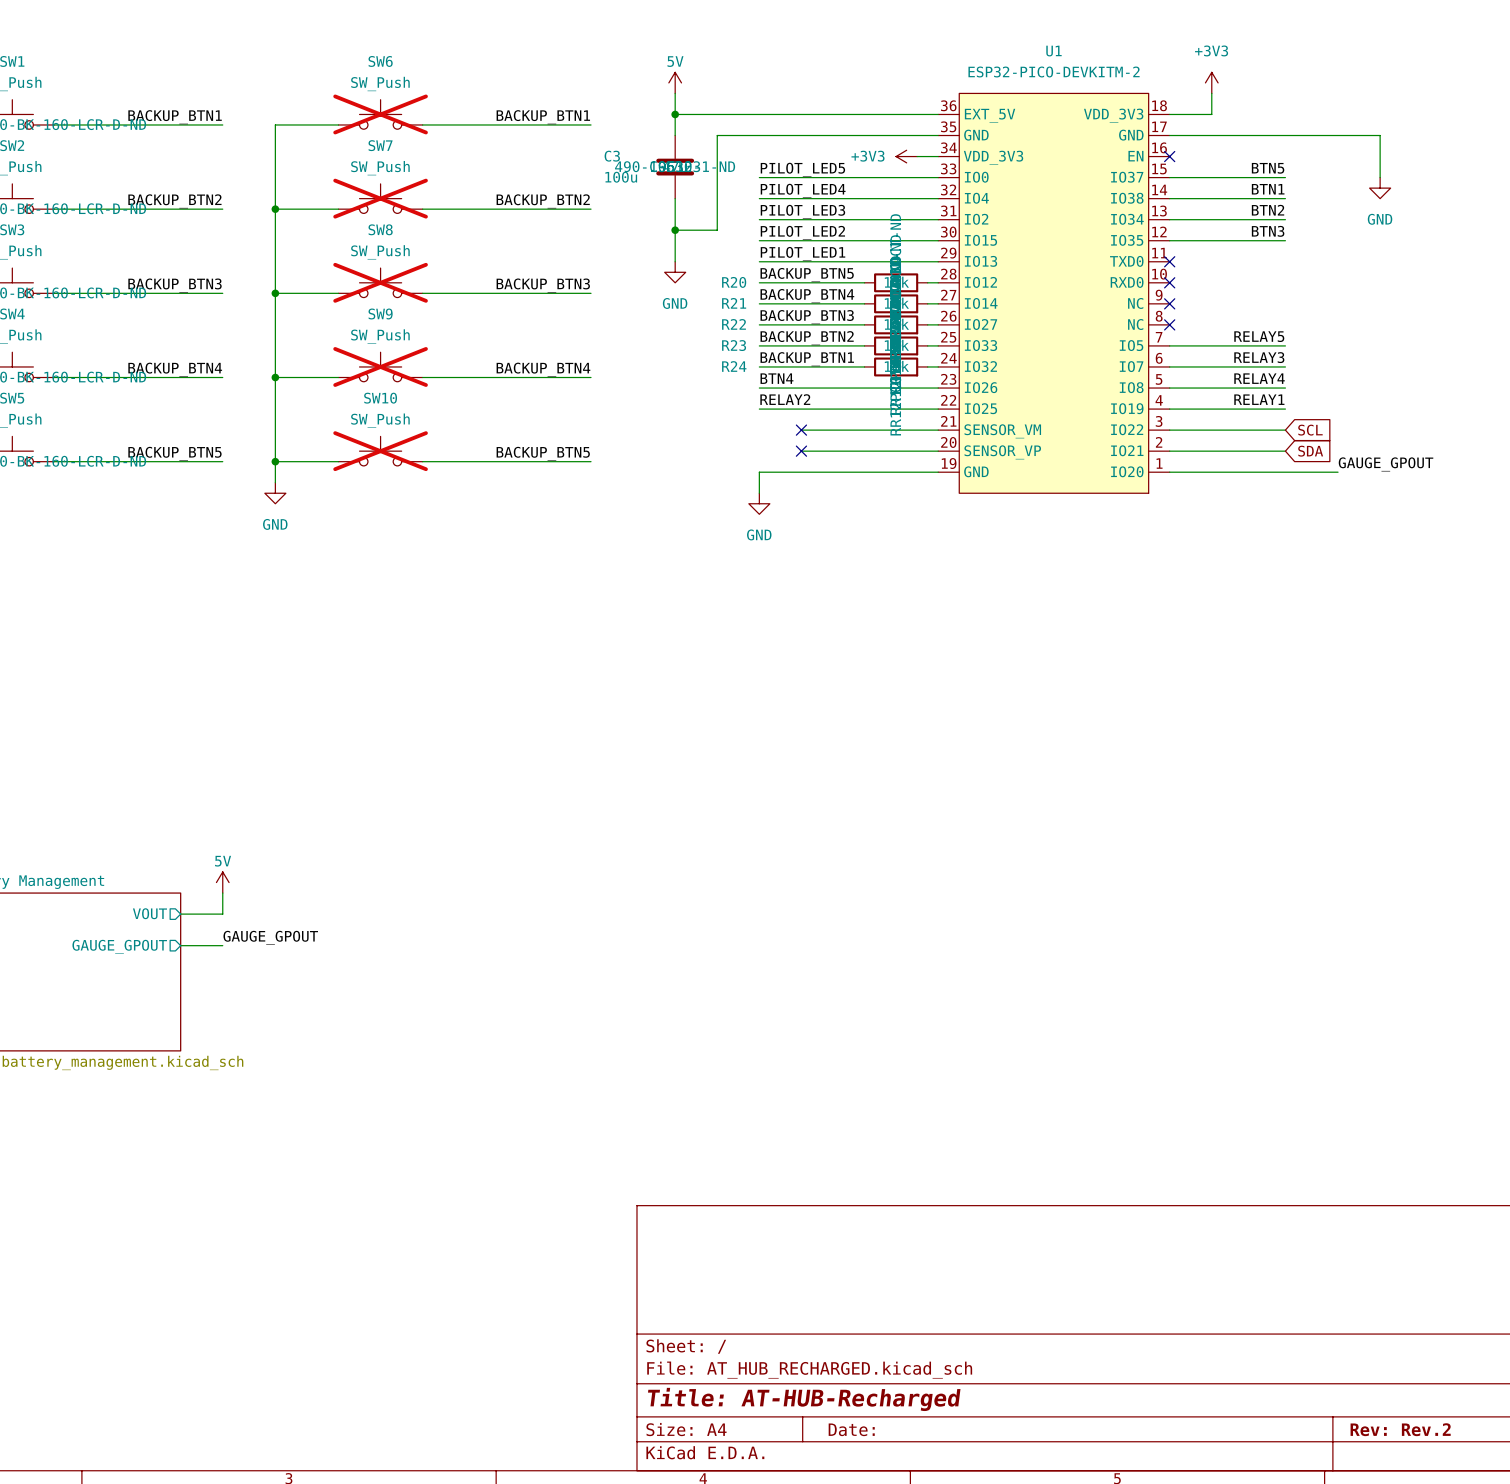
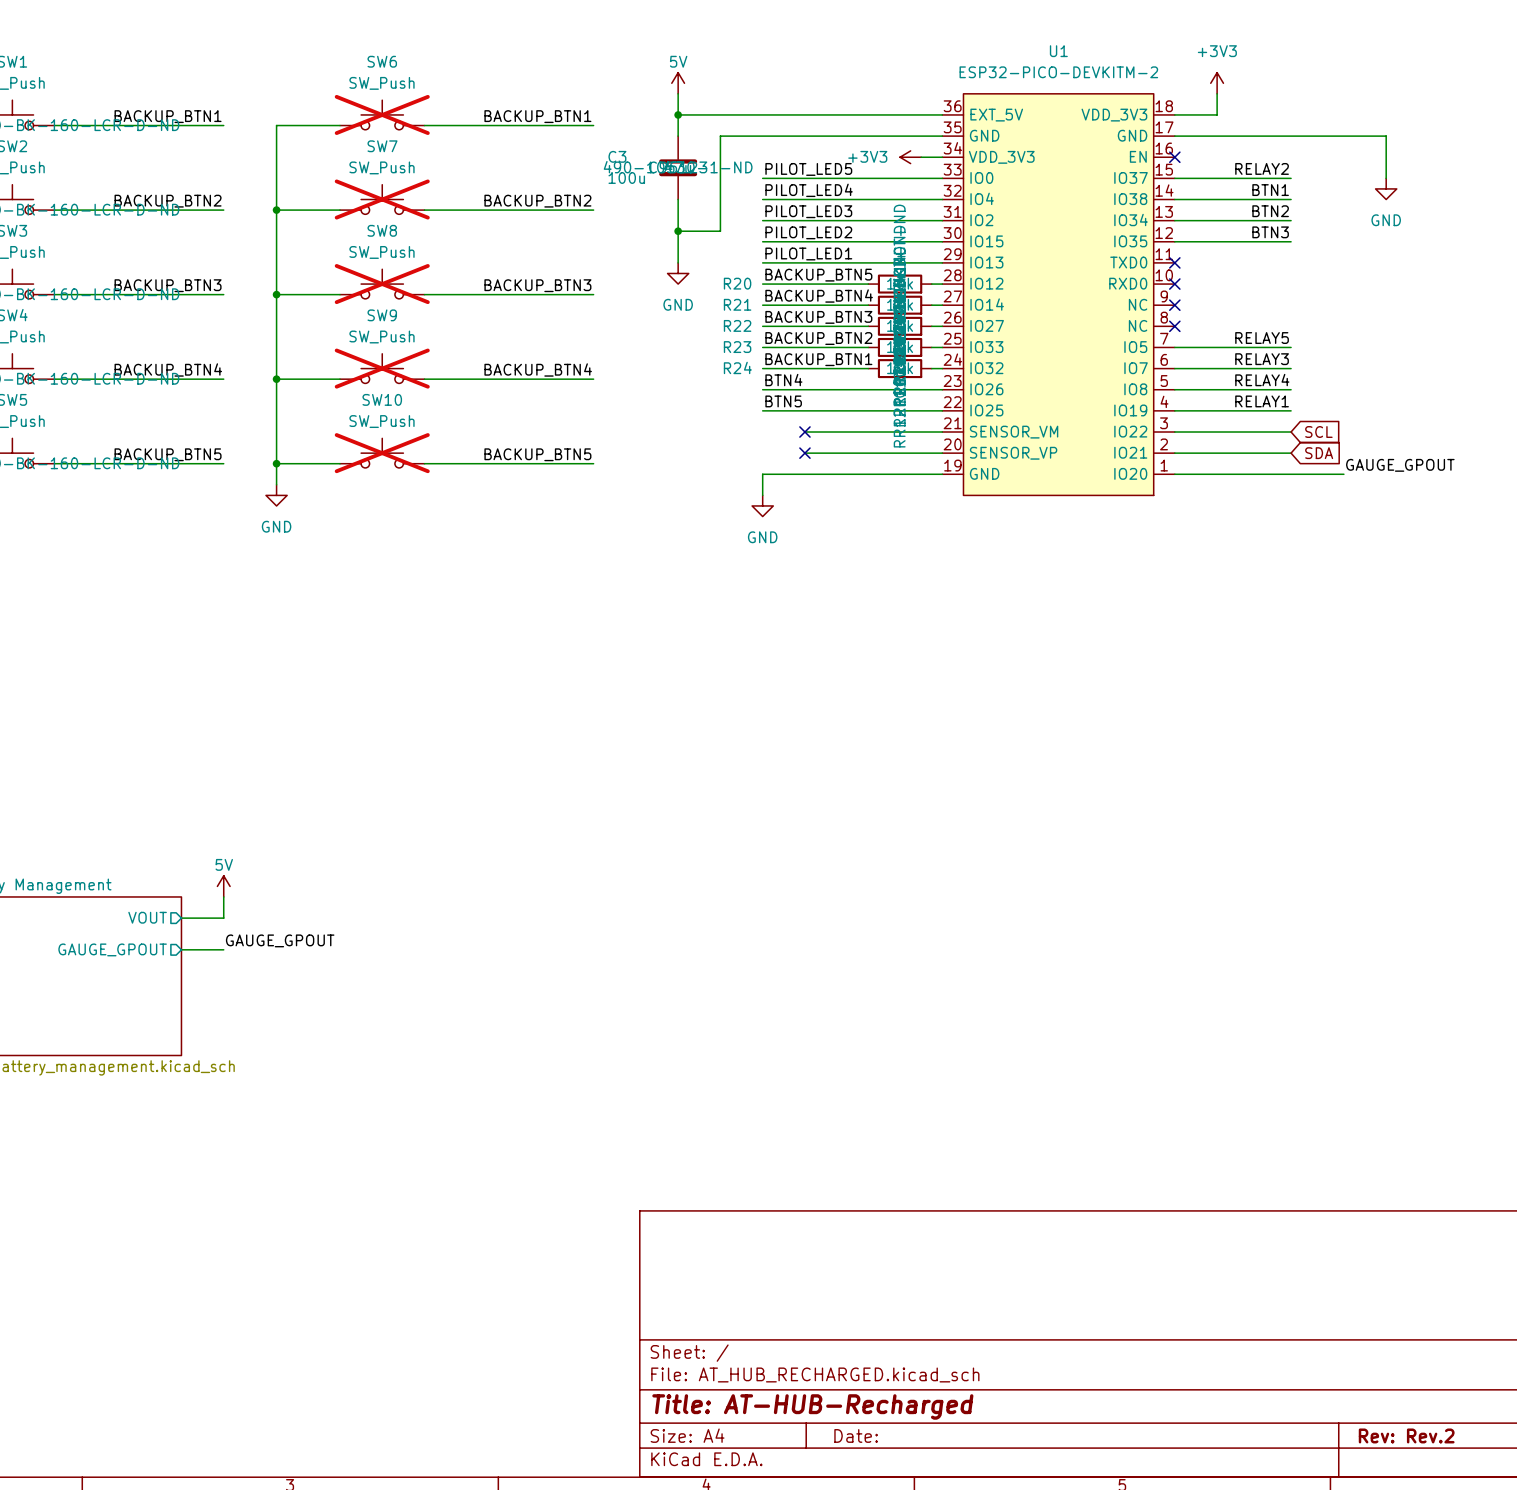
label: BTN5 (1268, 168) -> RELAY2 (1262, 168)
label: RELAY2 (785, 399) -> BTN5 (783, 401)

